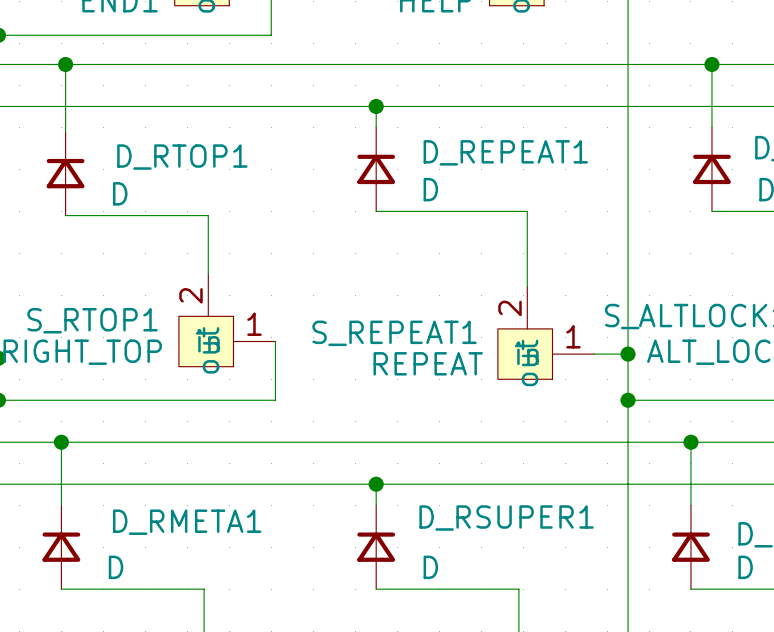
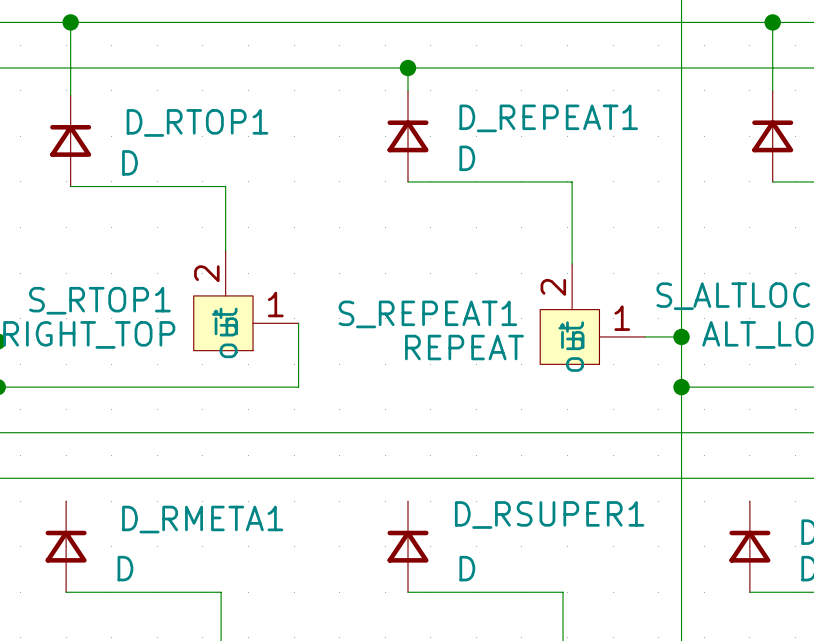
wire: (61, 442) (61, 505) -> none
junction: (61, 442) -> none
wire: (690, 442) (690, 505) -> none
junction: (690, 442) -> none
wire: (376, 484) (376, 505) -> none
junction: (376, 484) -> none

